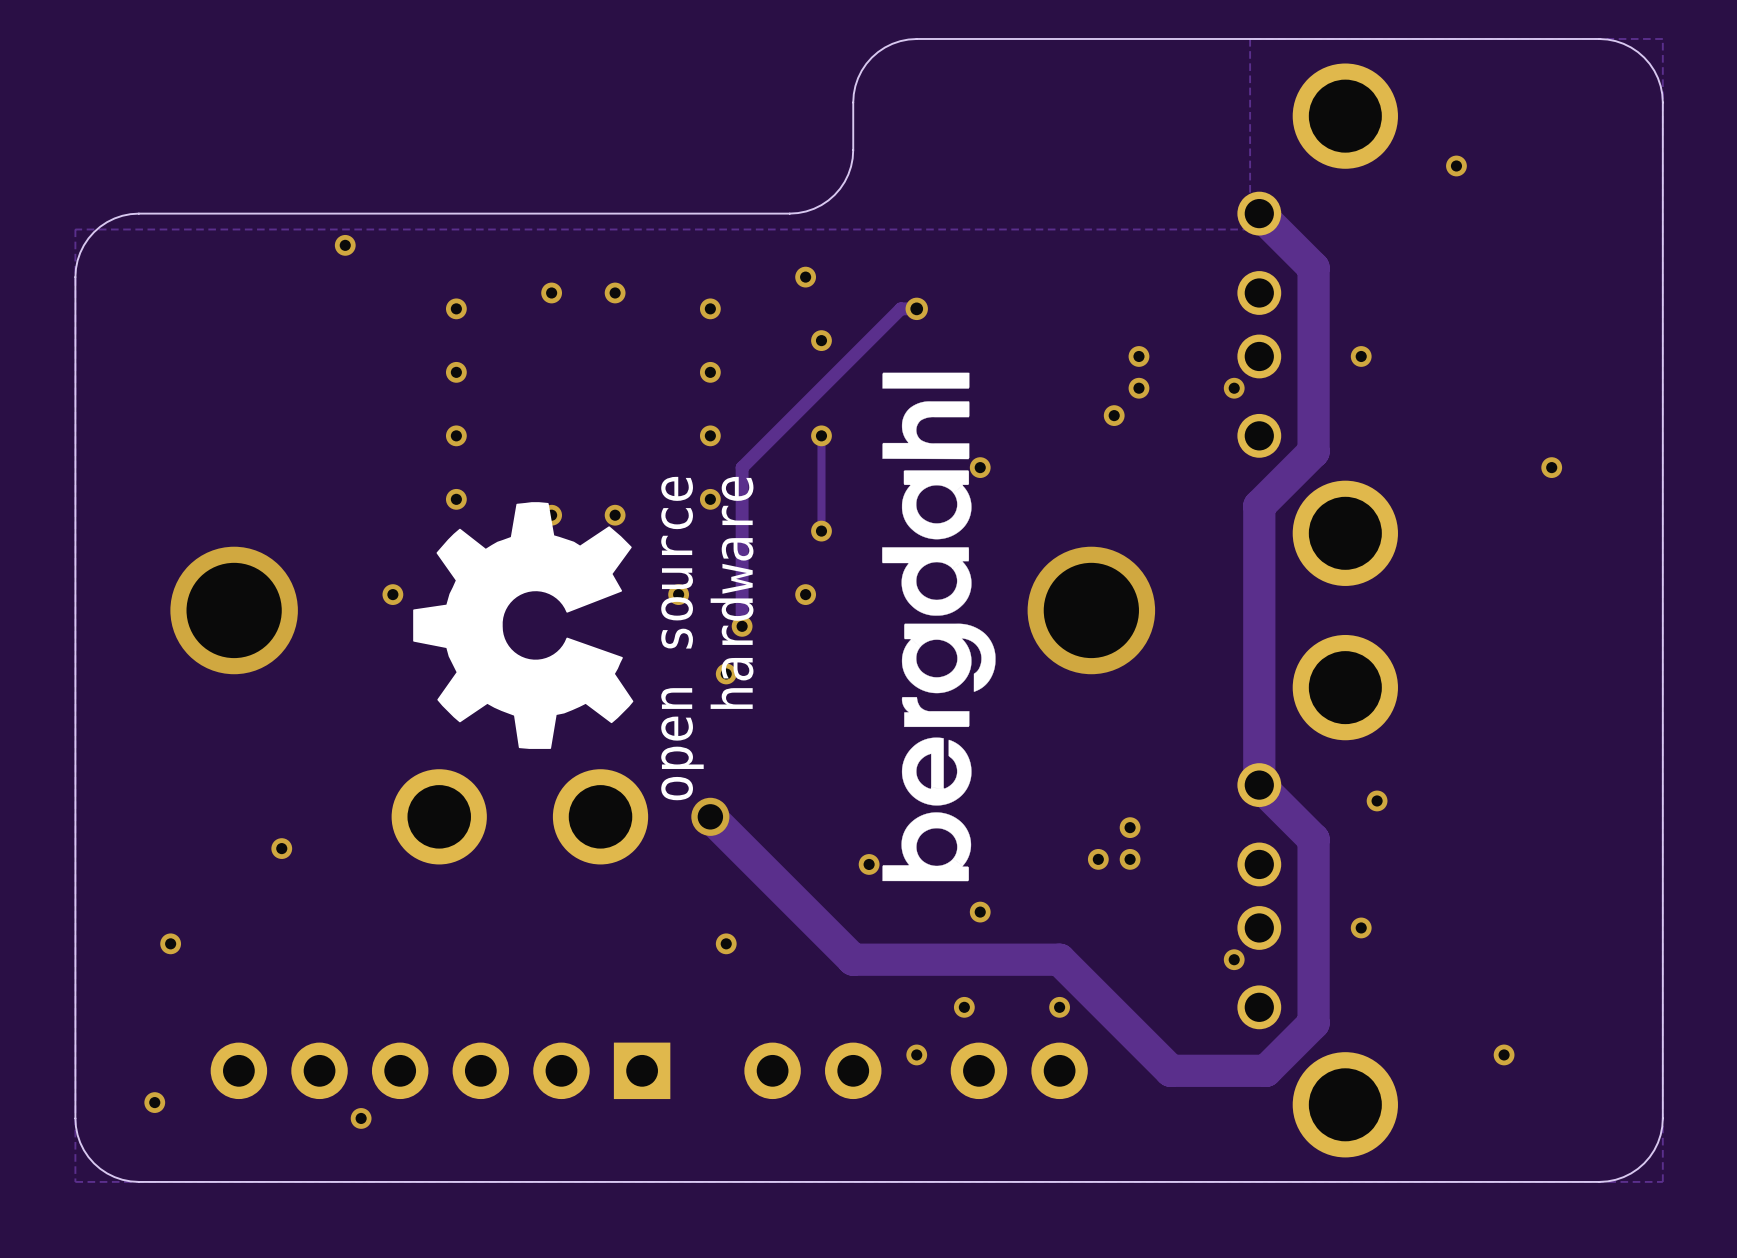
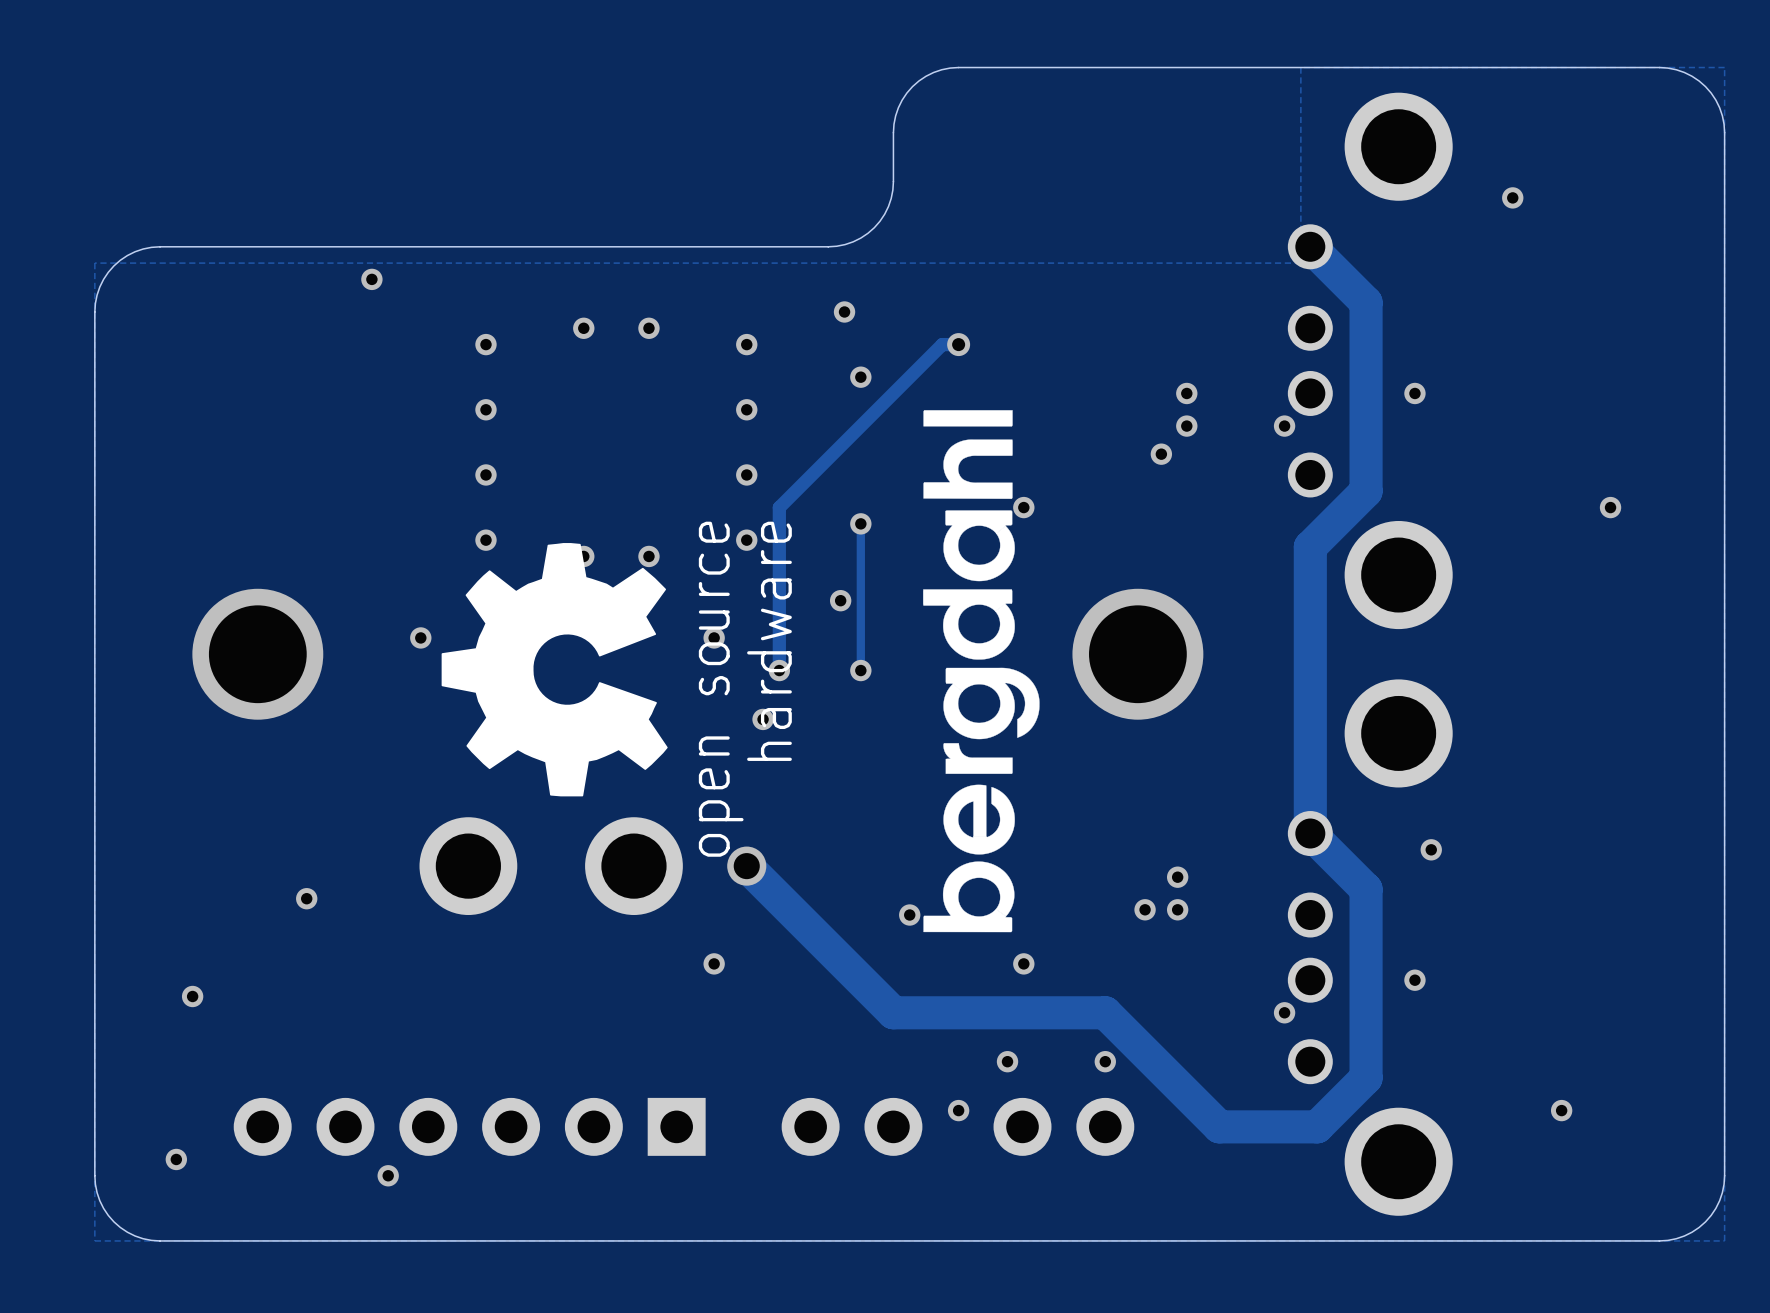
track: (821, 435) (821, 483) -> none
via: (821, 435) -> none
via: none -> (860, 523)
track: none -> (860, 572) (860, 670)
via: (821, 531) -> none
via: none -> (840, 600)
via: (805, 594) -> none
via: none -> (860, 670)
via position: (726, 943) -> (714, 963)

